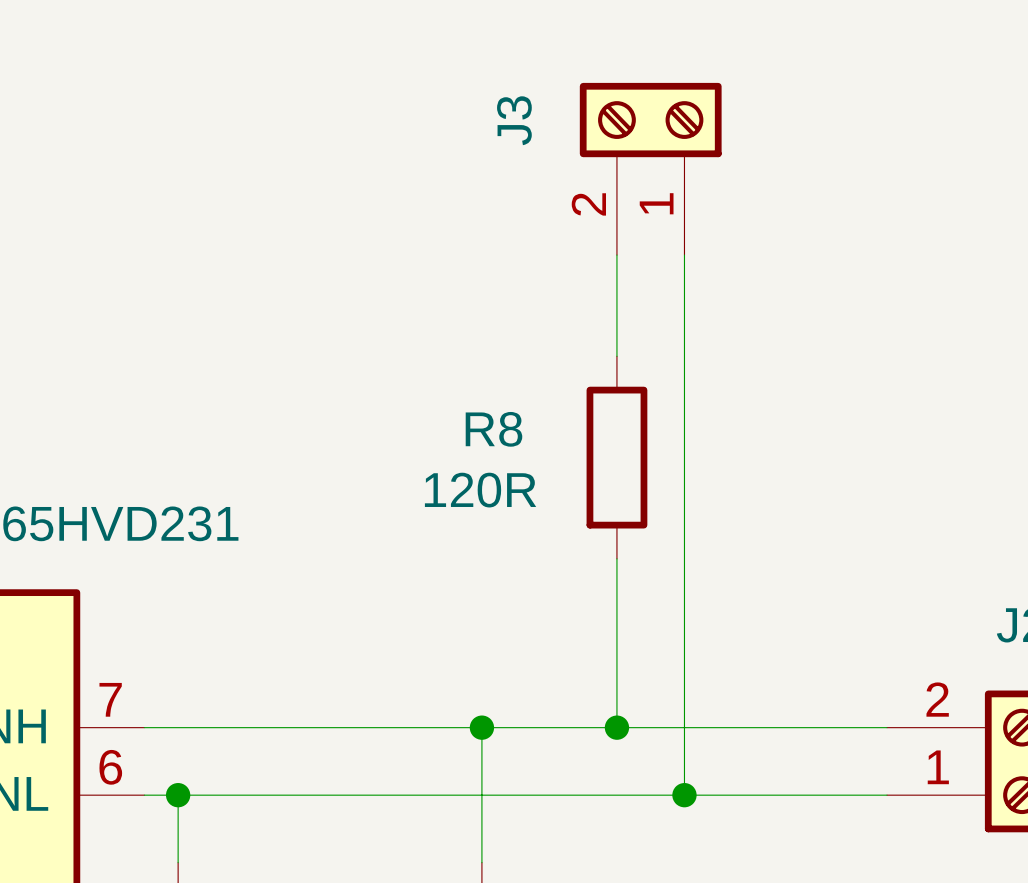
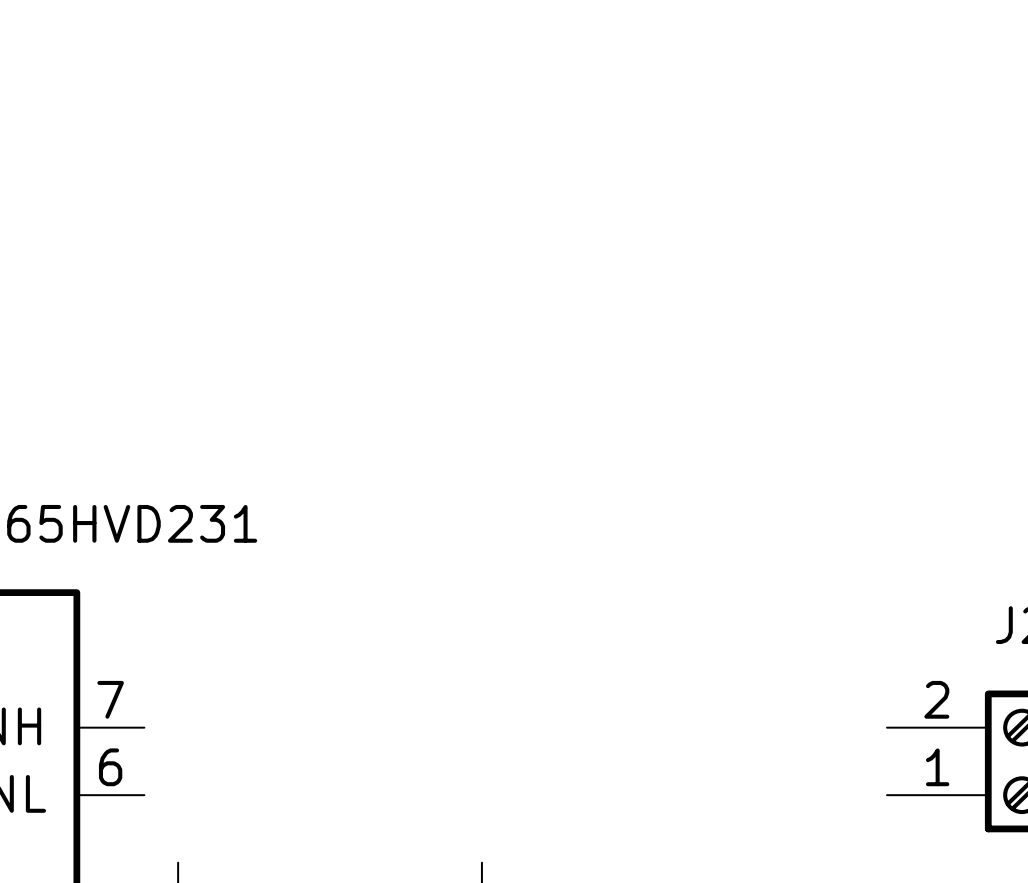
J3: (650, 168) -> none
wire: (616, 255) (616, 356) -> none
wire: (684, 255) (684, 795) -> none
R8: 120R (616, 457) -> none
wire: (616, 558) (616, 727) -> none
wire: (144, 727) (887, 727) -> none
wire: (481, 727) (481, 862) -> none
junction: (481, 727) -> none
junction: (616, 727) -> none
wire: (144, 795) (887, 795) -> none
wire: (178, 795) (178, 862) -> none
junction: (178, 795) -> none
junction: (684, 795) -> none

